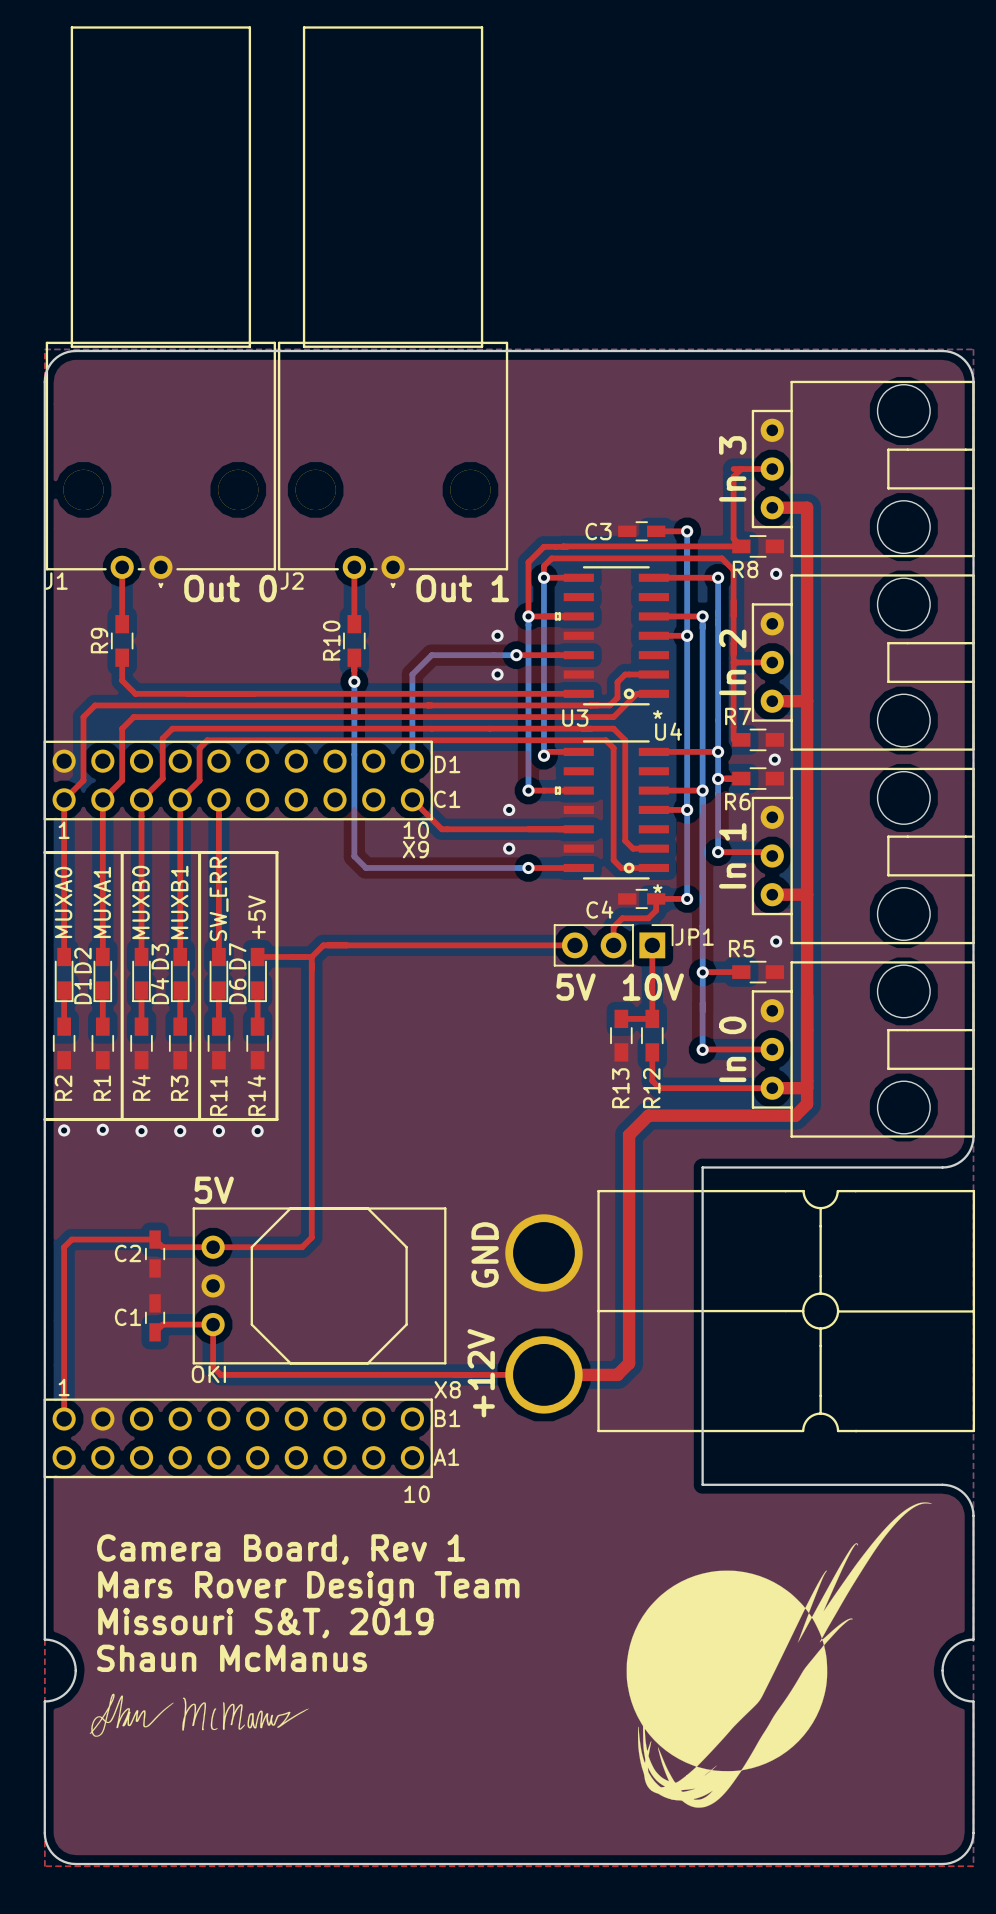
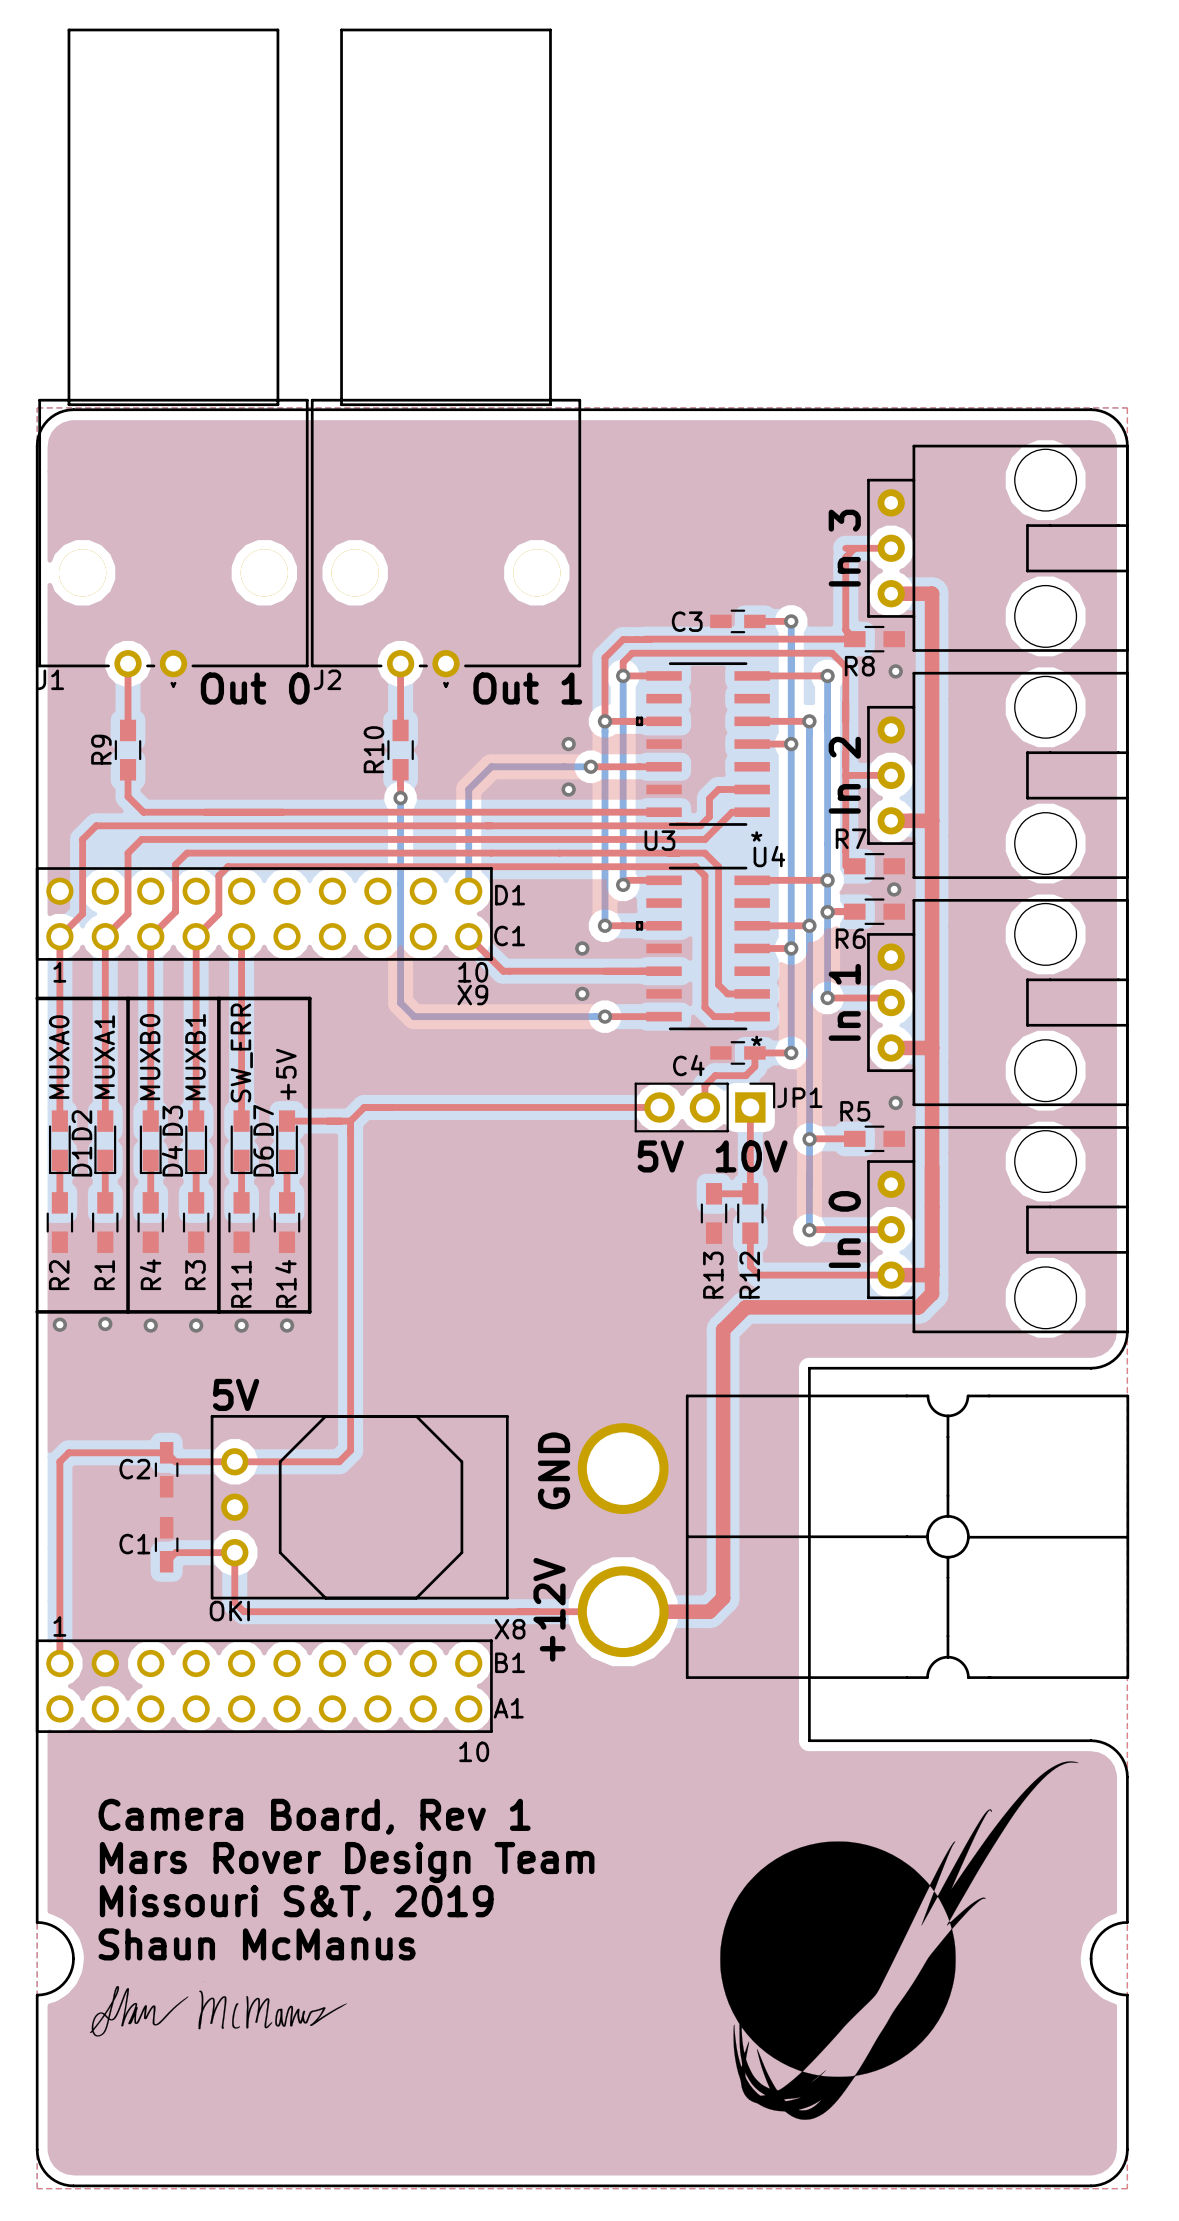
drawing: [623, 688, 635, 700] -> none
drawing: [623, 862, 635, 874] -> none

